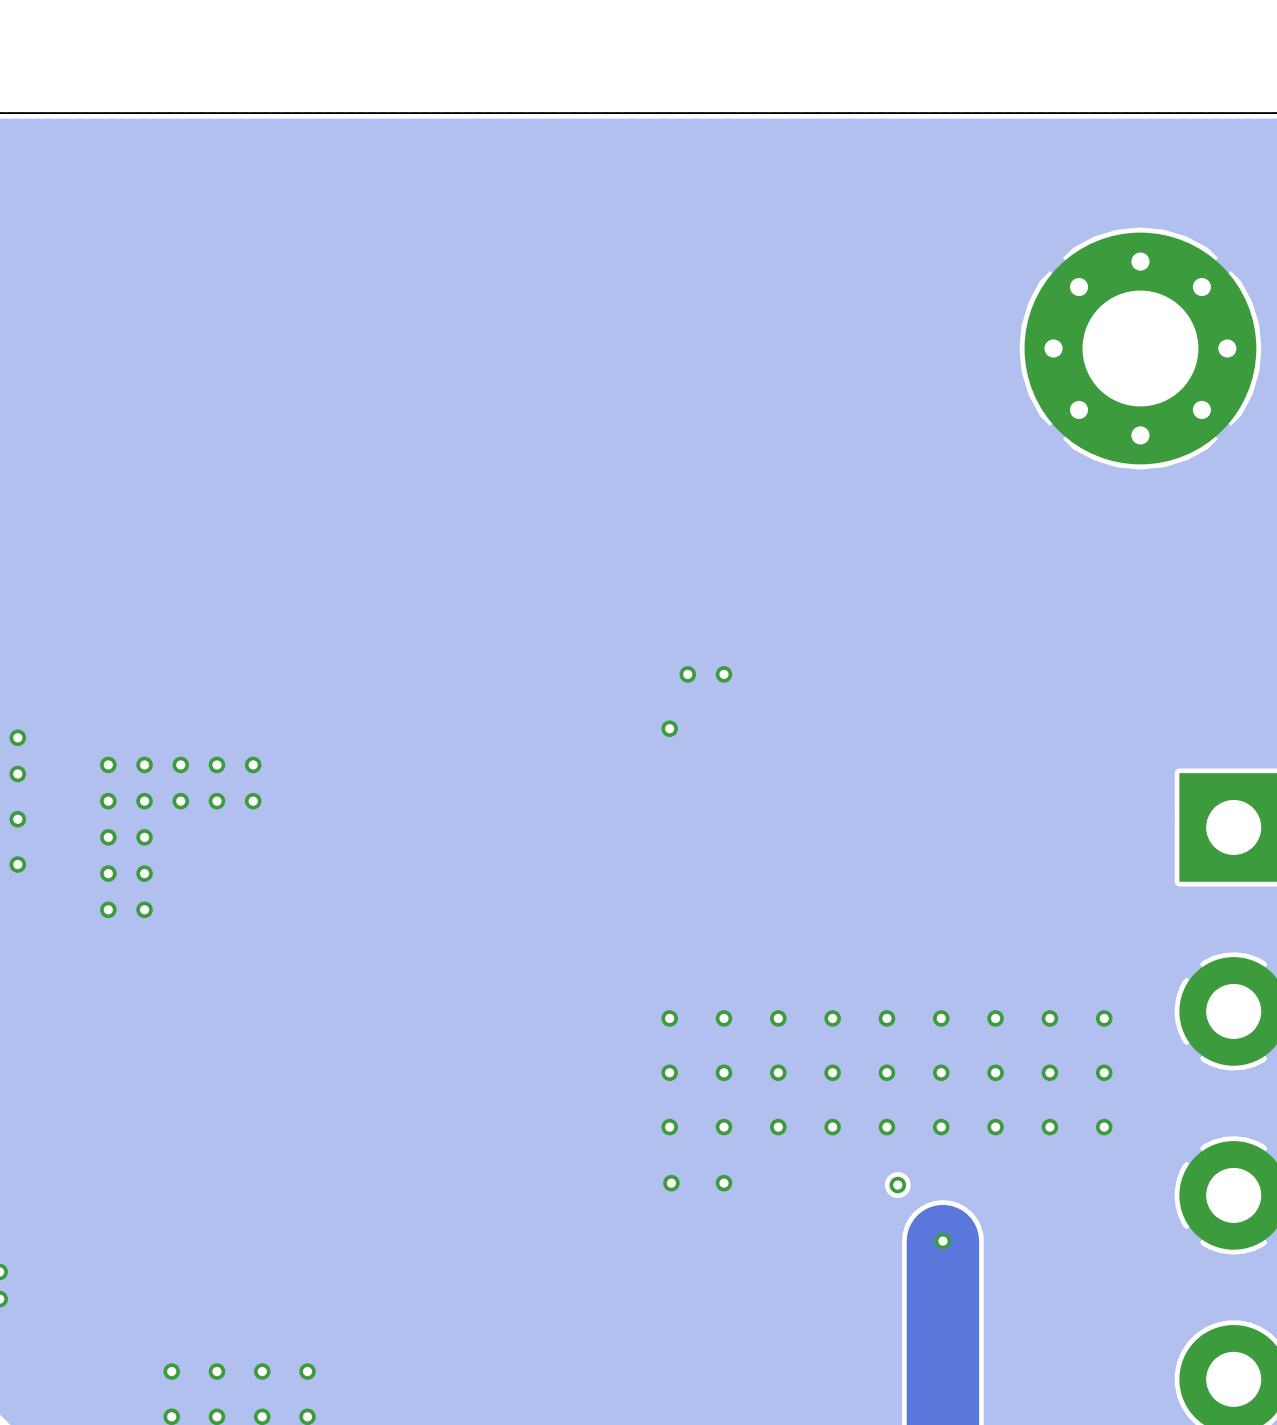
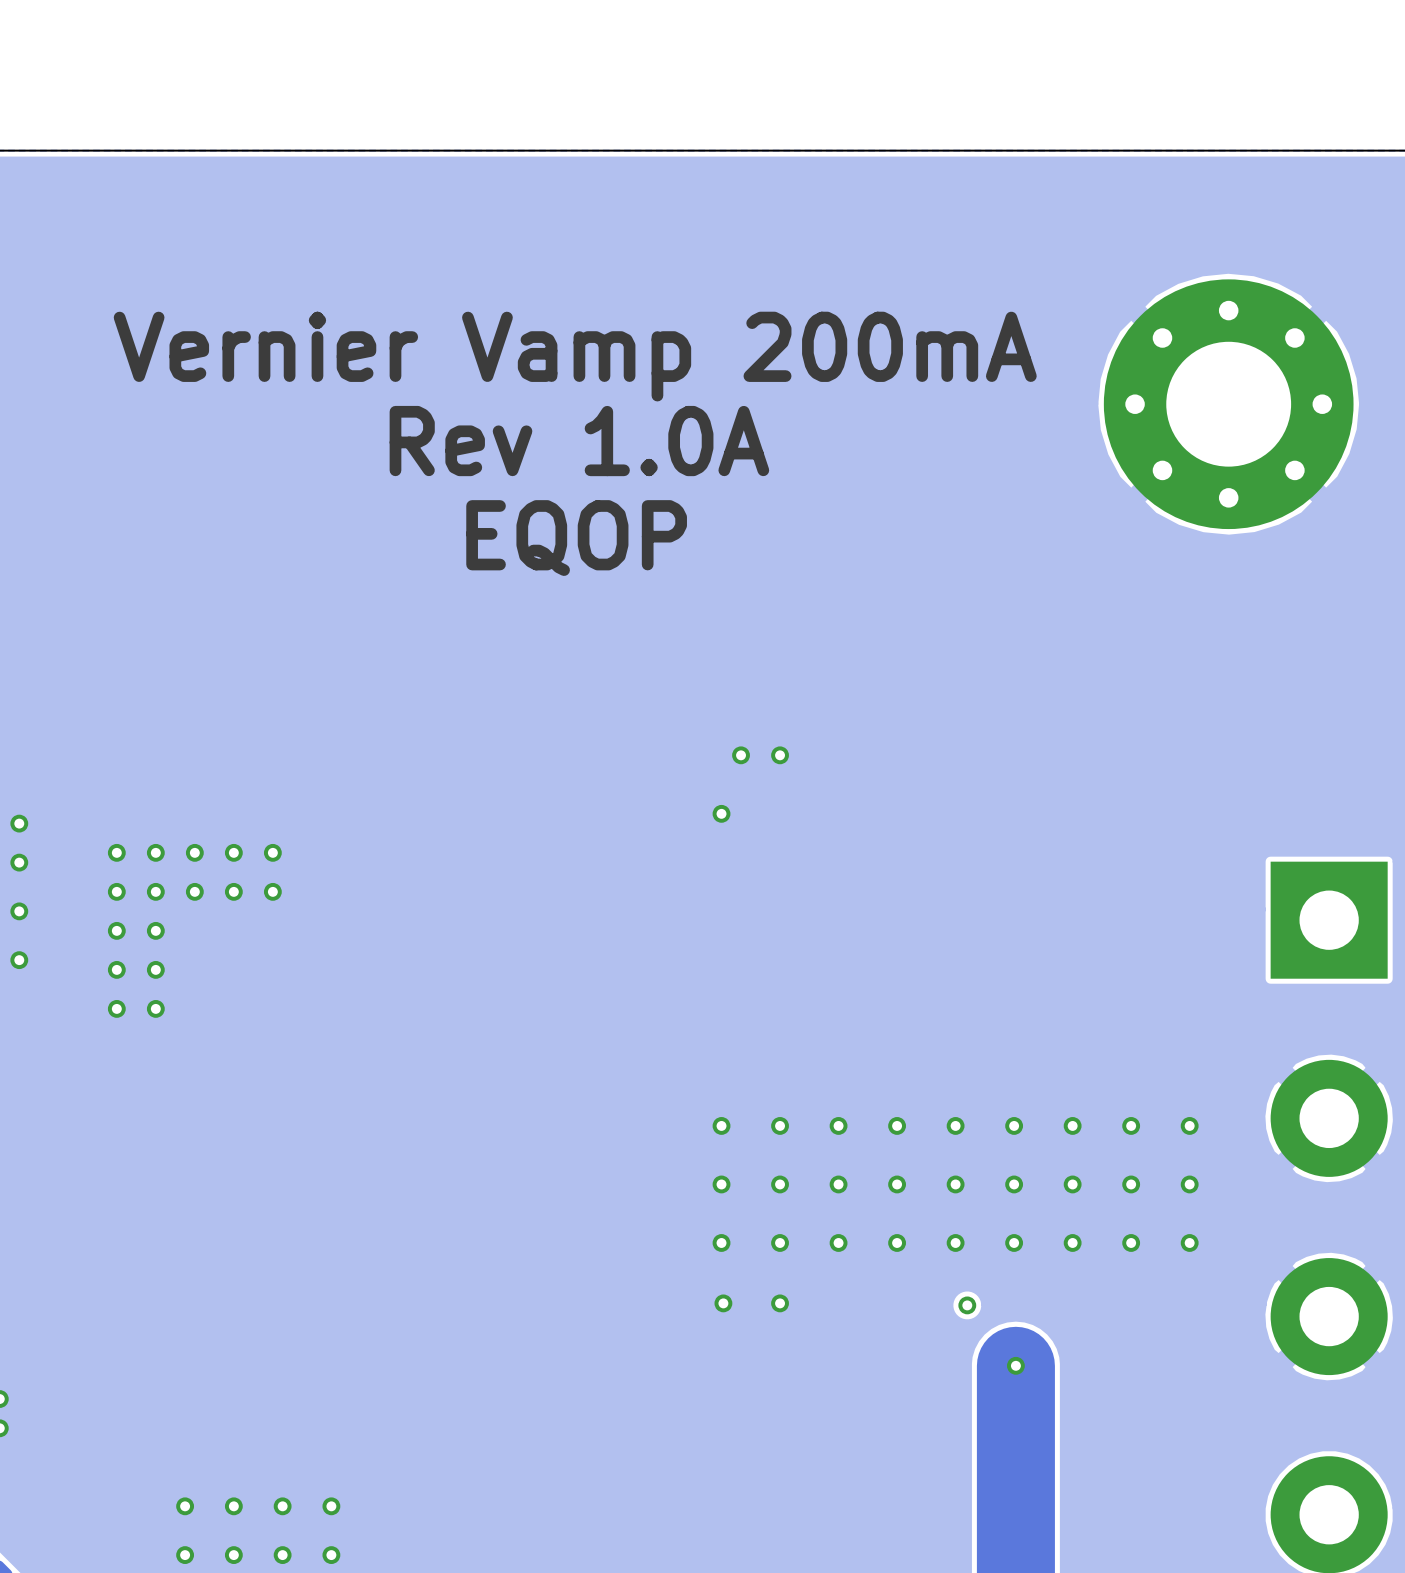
text: none -> Vernier Vamp 200mA (575, 356)
text: none -> Rev 1.0A (579, 441)
text: none -> EQOP (576, 538)

